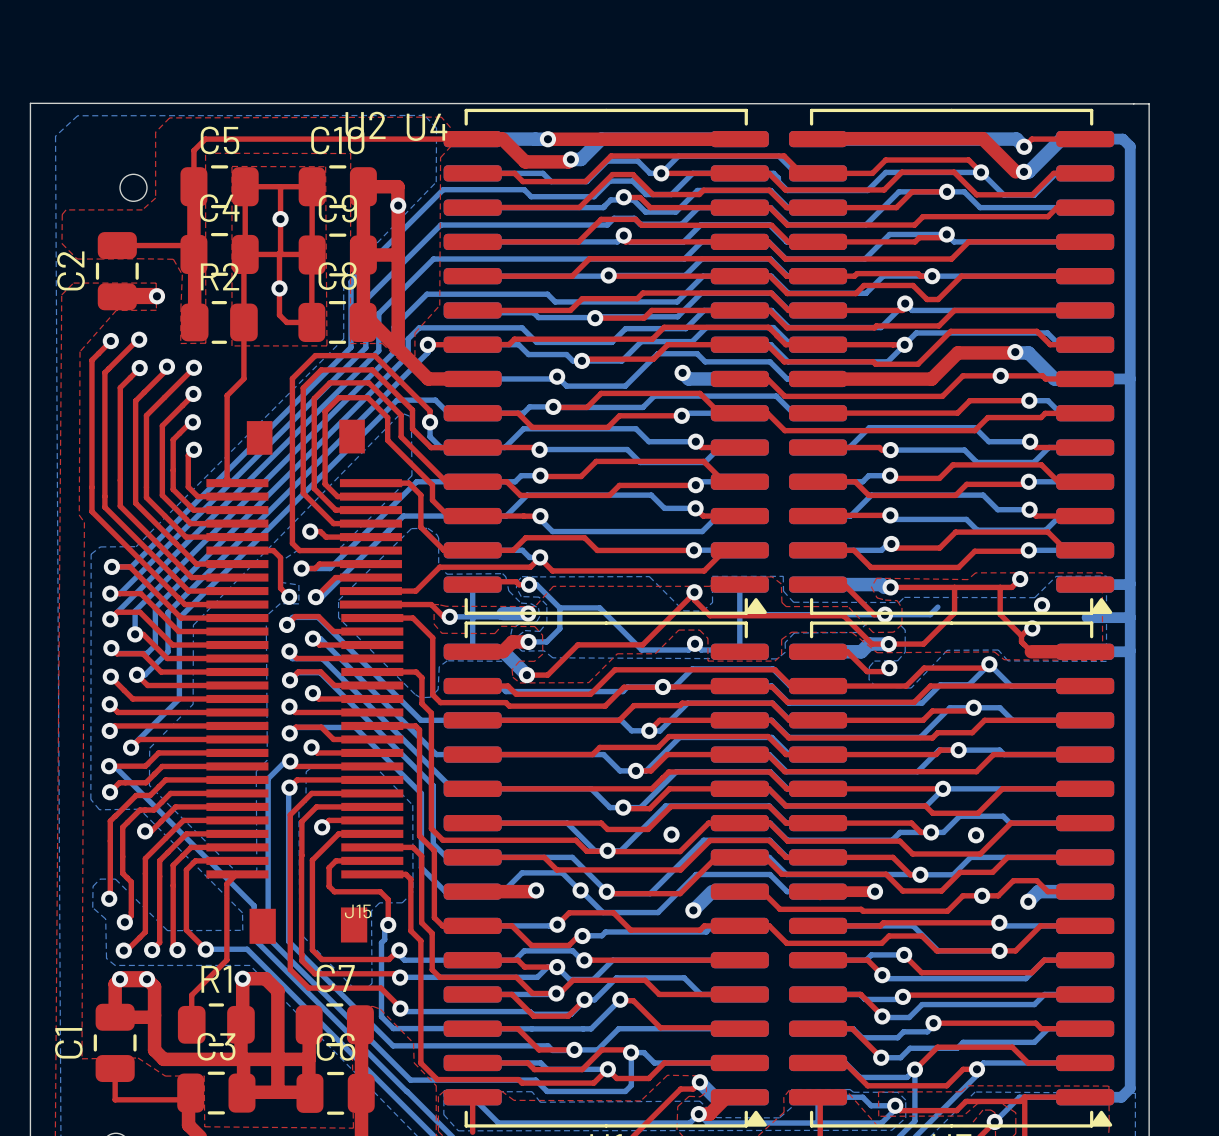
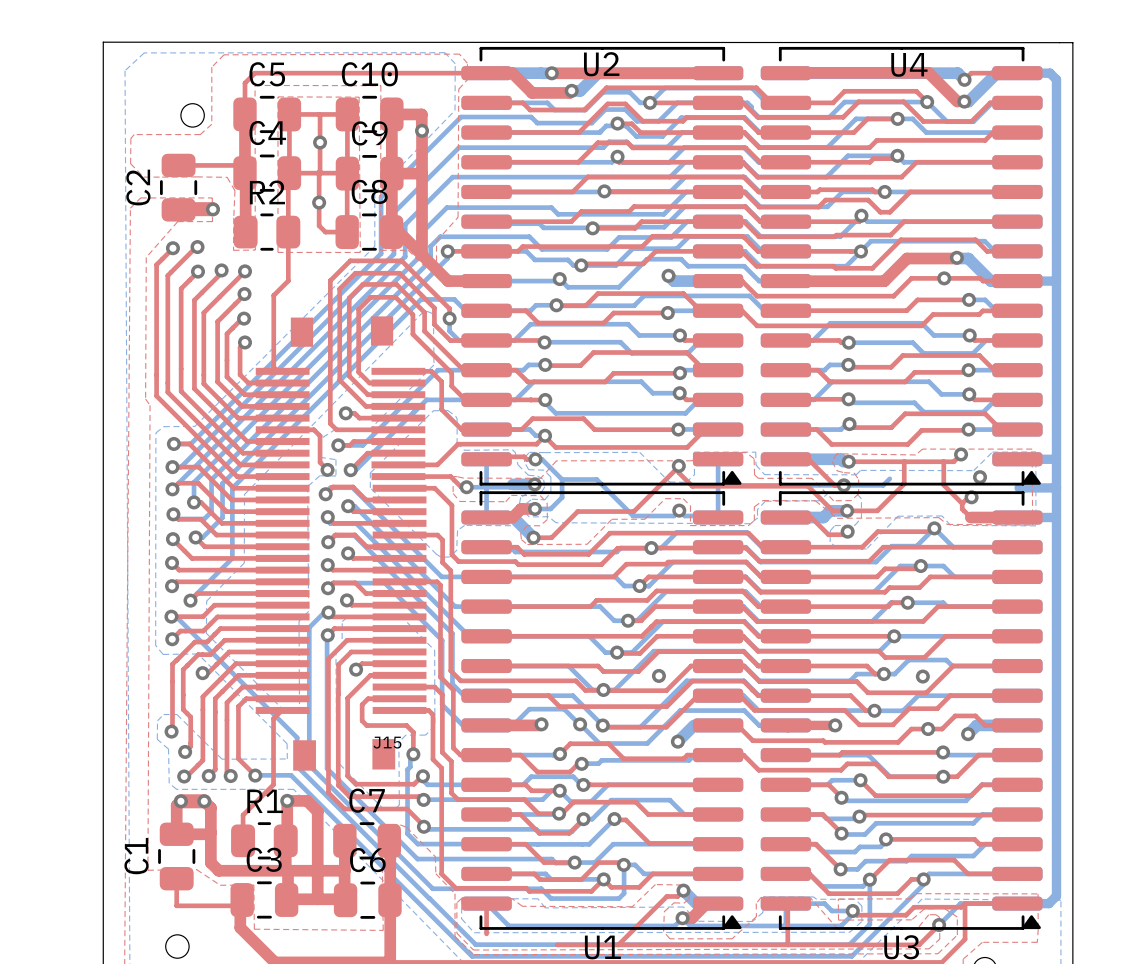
U2 name position: U2 (365, 125) -> U2 (601, 64)
U4 name position: U4 (427, 127) -> U4 (909, 64)

